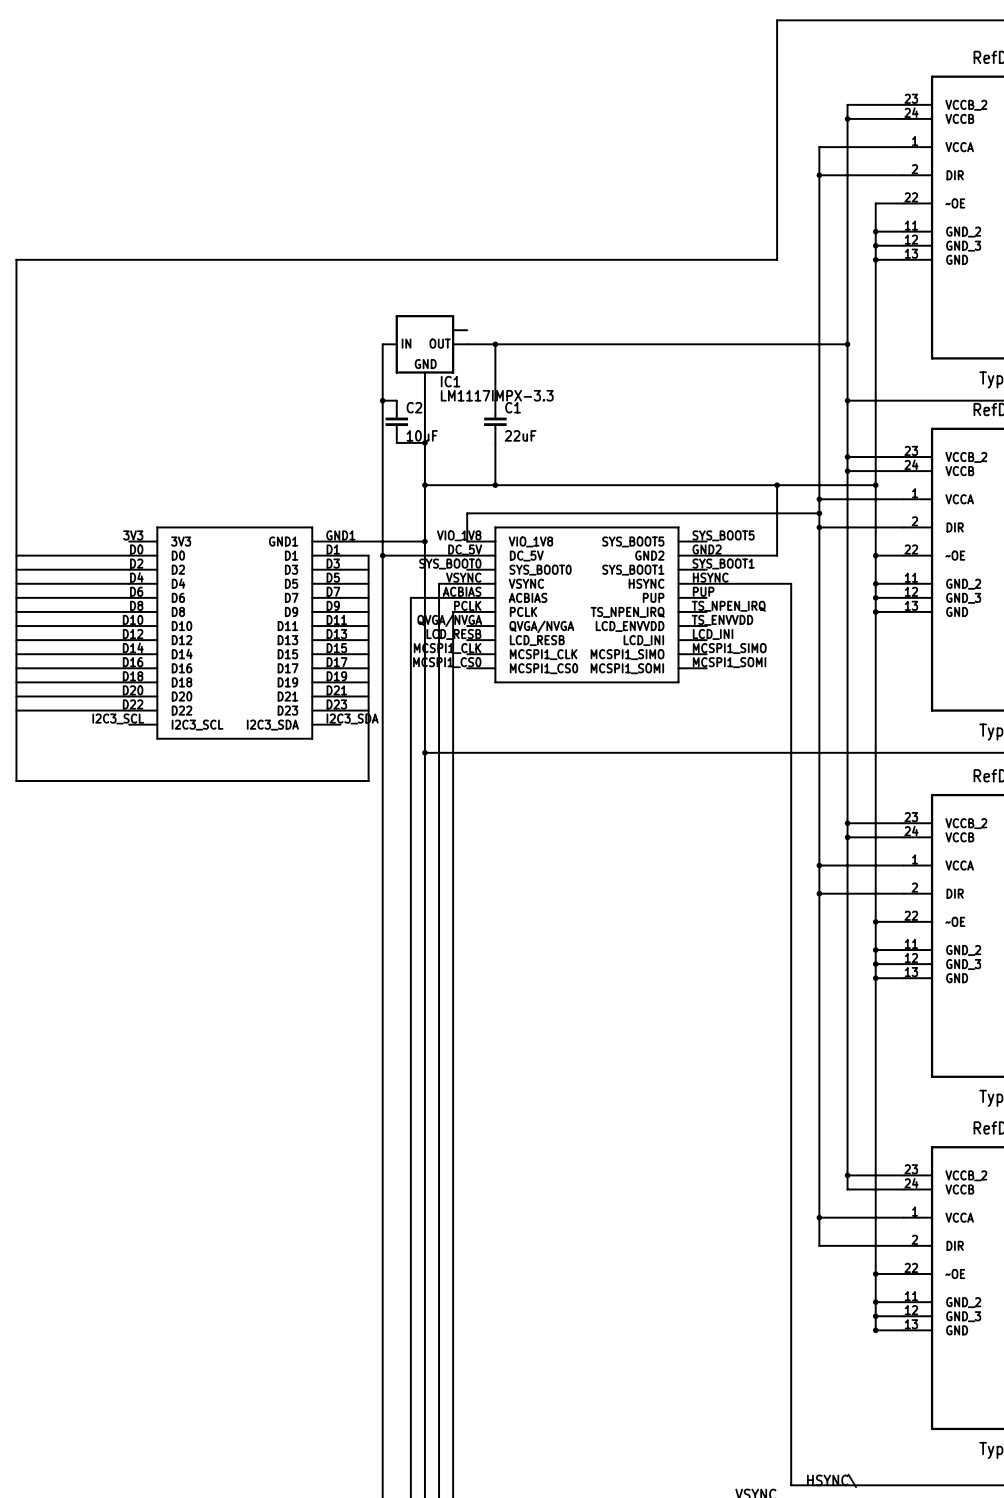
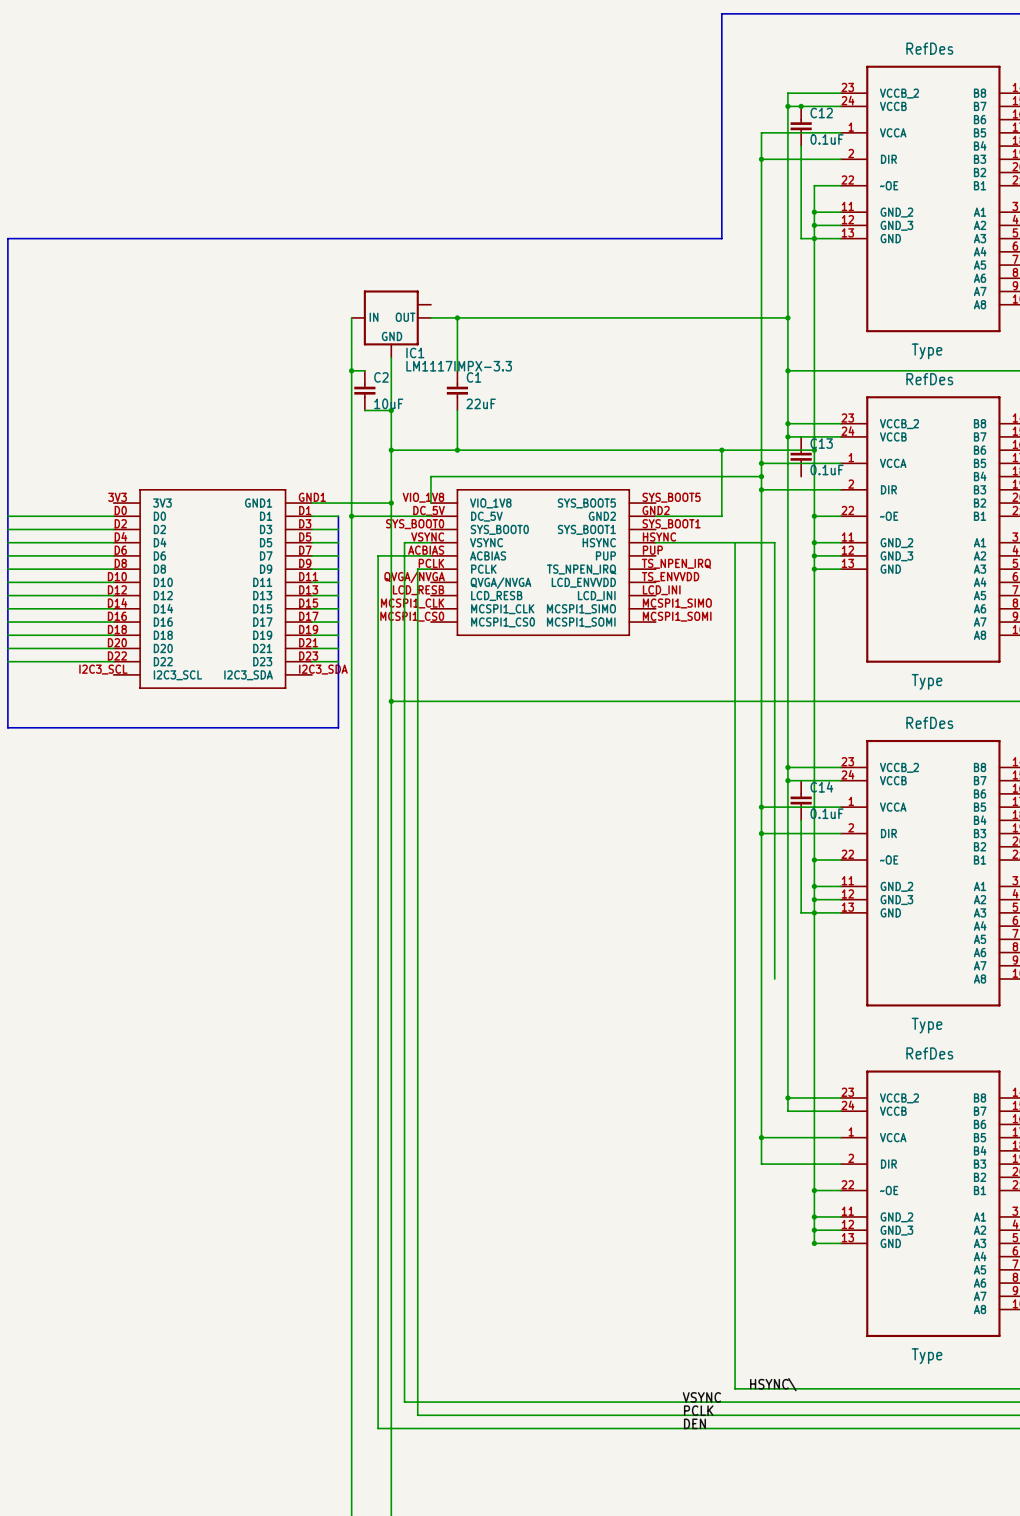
junction: none -> (801, 106)
C12: none -> 0.1uF (801, 126)
wire: none -> (801, 146) (801, 238) (814, 238)
C13: none -> 0.1uF (801, 456)
wire: none -> (735, 542) (774, 542) (774, 978)
C14: none -> 0.1uF (801, 800)
wire: none -> (801, 820) (801, 912) (814, 912)

